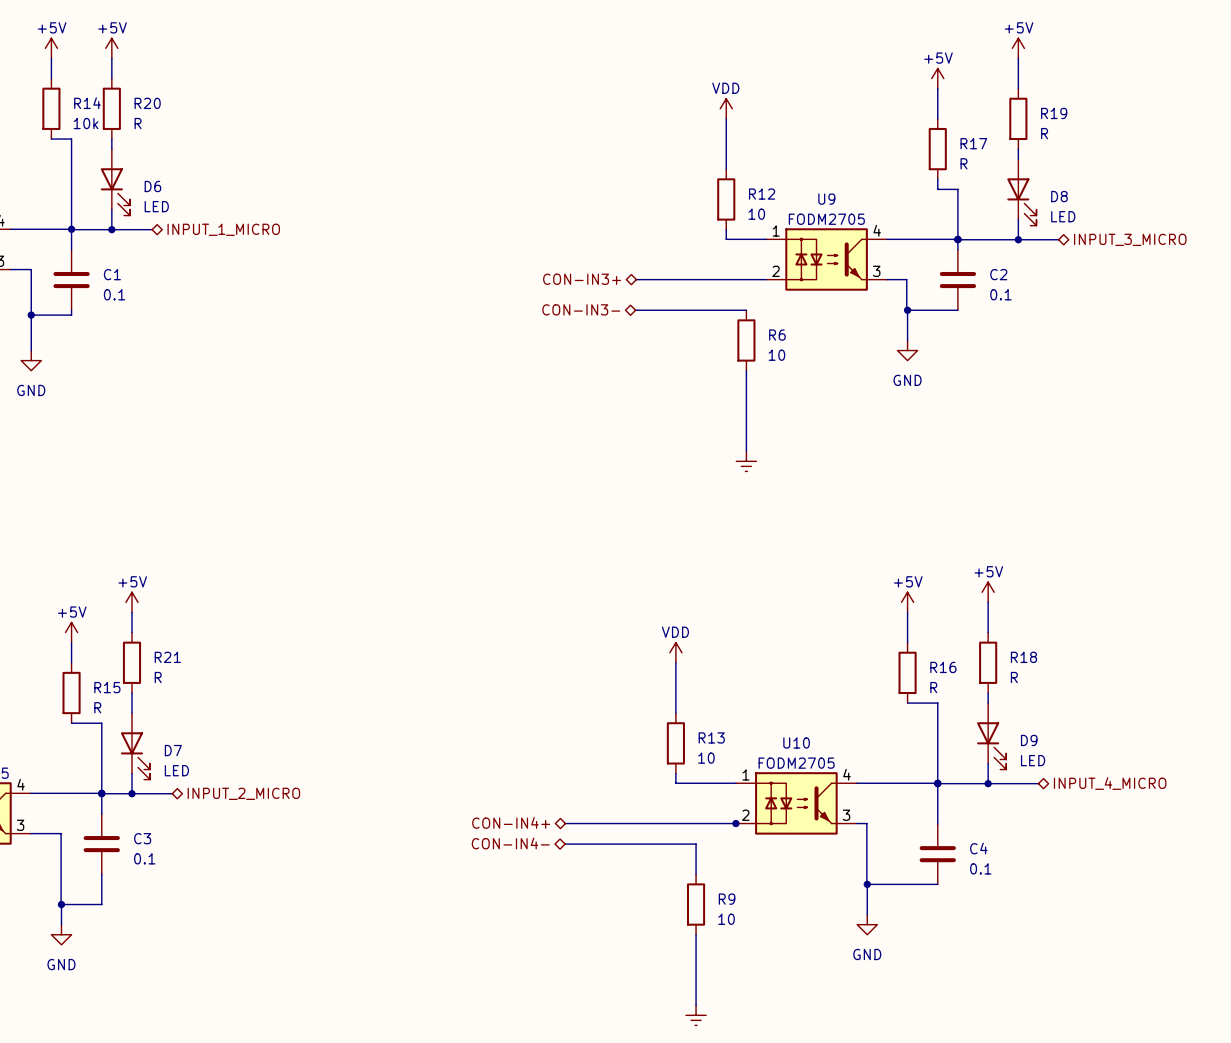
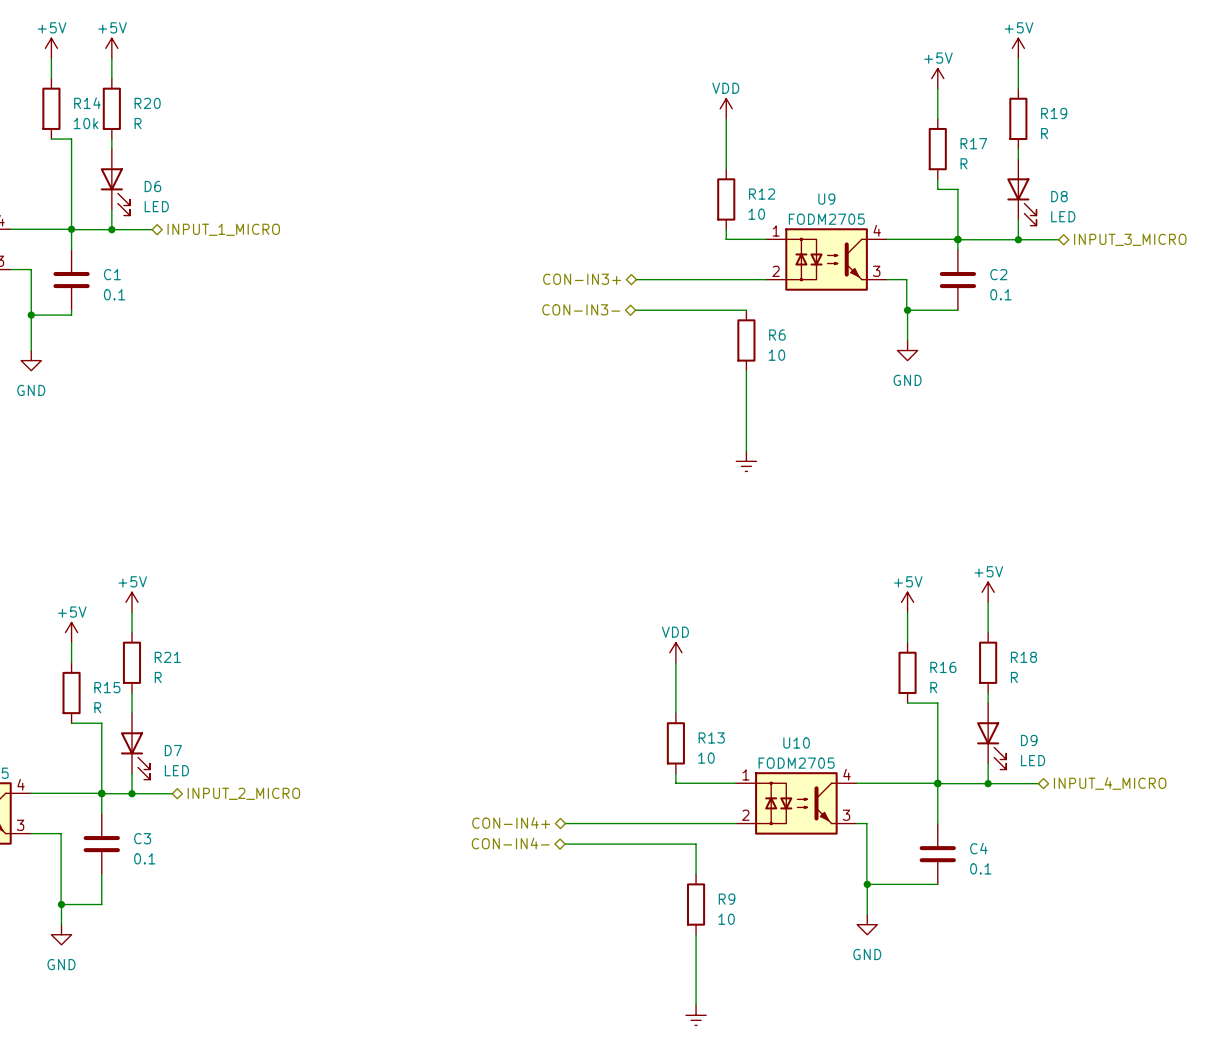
junction: (735, 823) -> none

